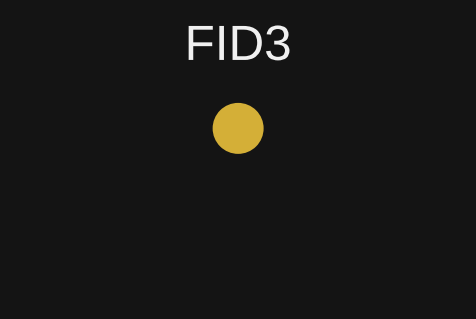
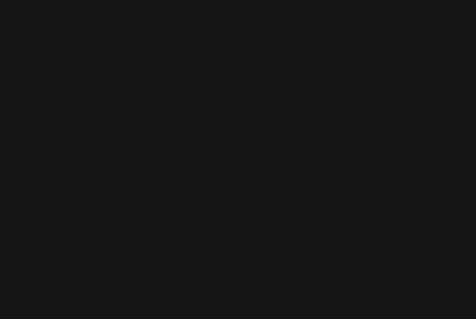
FID3: (238, 128) -> none

